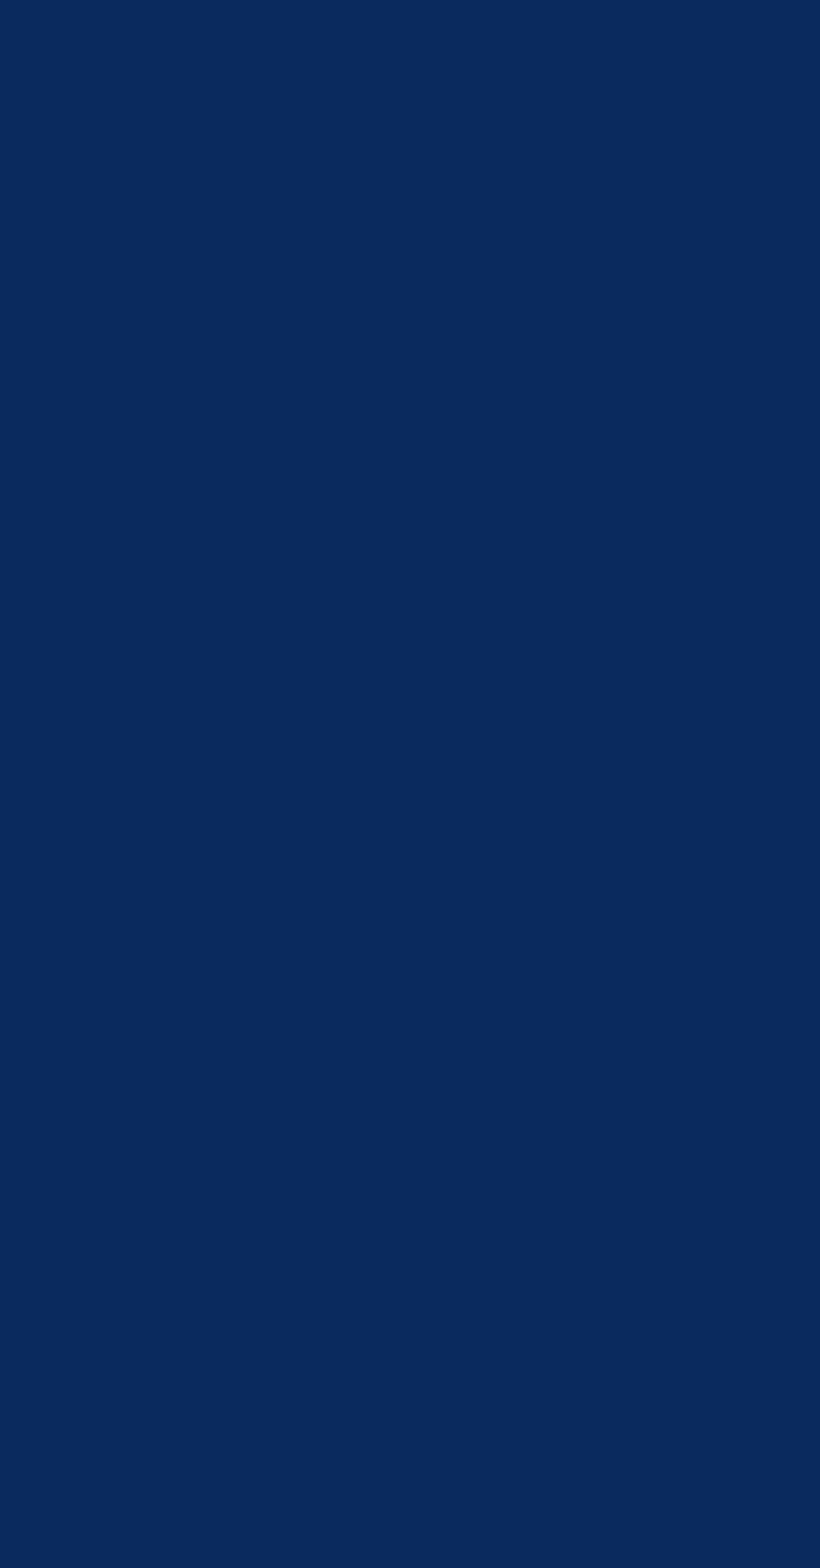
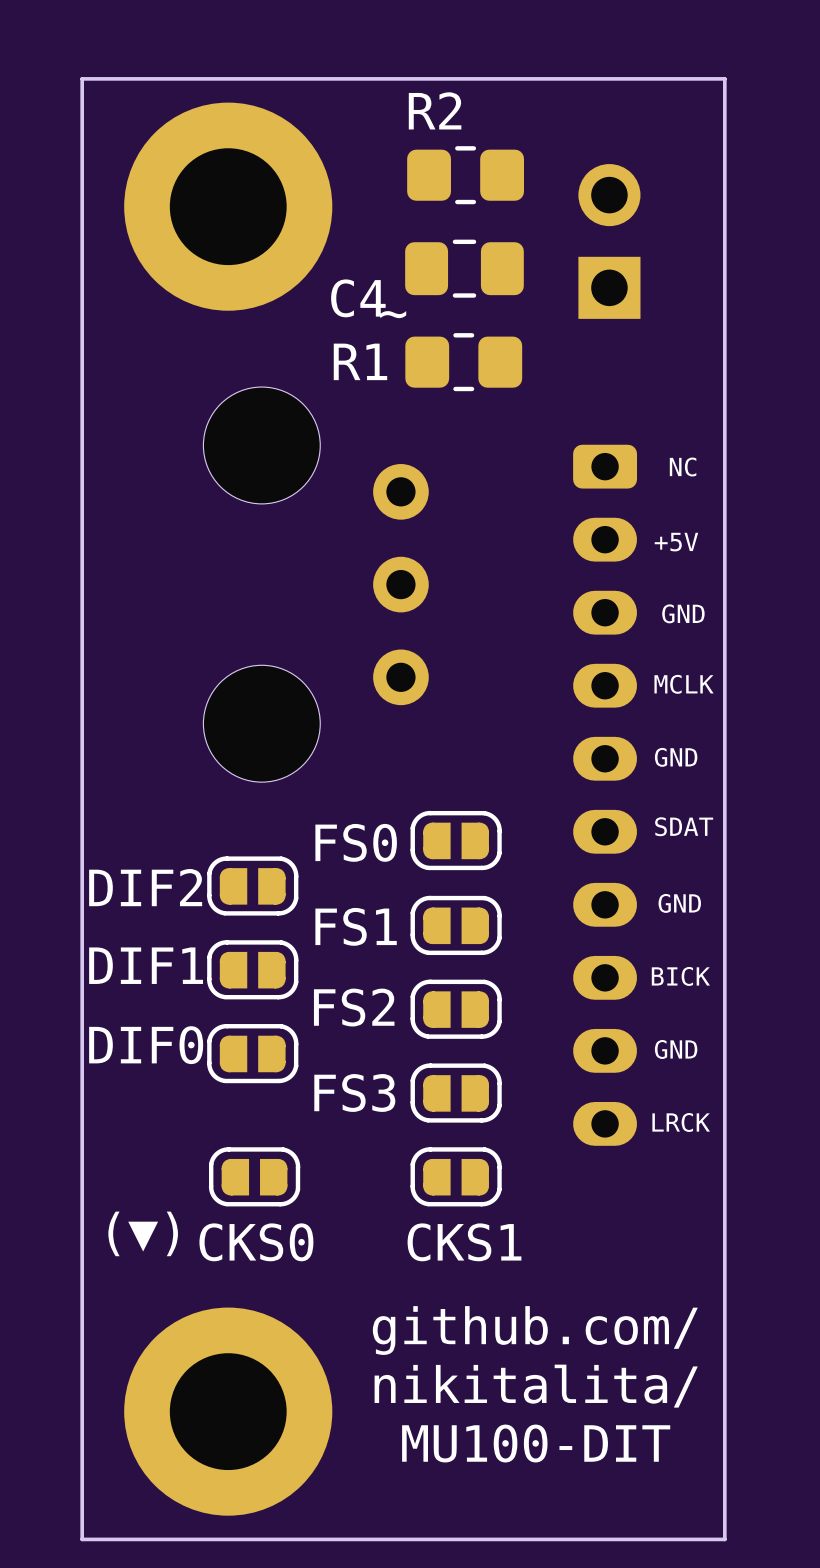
board edge: none -> (724, 78) (82, 78) (82, 1539) (724, 1539) (724, 78)
R2: none -> (465, 175)
part: none -> (228, 206)
part: none -> (609, 241)
C4: none -> (464, 268)
text: none -> ~ (393, 314)
R1: none -> (463, 362)
text: none -> NC (683, 467)
text: none -> +5V (676, 542)
part: none -> (316, 584)
text: none -> GND (683, 613)
text: none -> MCLK (684, 684)
text: none -> GND (676, 757)
part: none -> (605, 795)
text: none -> SDAT (684, 826)
part: none -> (456, 840)
text: none -> FS0 (356, 842)
part: none -> (252, 885)
text: none -> DIF2 (145, 887)
text: none -> GND (679, 903)
part: none -> (456, 925)
text: none -> FS1 (356, 926)
text: none -> DIF1 (146, 965)
part: none -> (252, 969)
text: none -> BICK (680, 976)
text: none -> FS2 (354, 1007)
part: none -> (456, 1009)
text: none -> DIF0 (146, 1045)
text: none -> GND (676, 1049)
part: none -> (252, 1053)
text: none -> FS3 (354, 1092)
part: none -> (456, 1093)
text: none -> LRCK (681, 1122)
part: none -> (254, 1176)
part: none -> (456, 1176)
text: none -> (▼) (143, 1233)
text: none -> CKS0 (256, 1242)
text: none -> CKS1 (464, 1242)
text: none -> github.com/ (535, 1330)
text: none -> nikitalita/ (536, 1386)
part: none -> (228, 1411)
text: none -> MU100-DIT (536, 1443)

